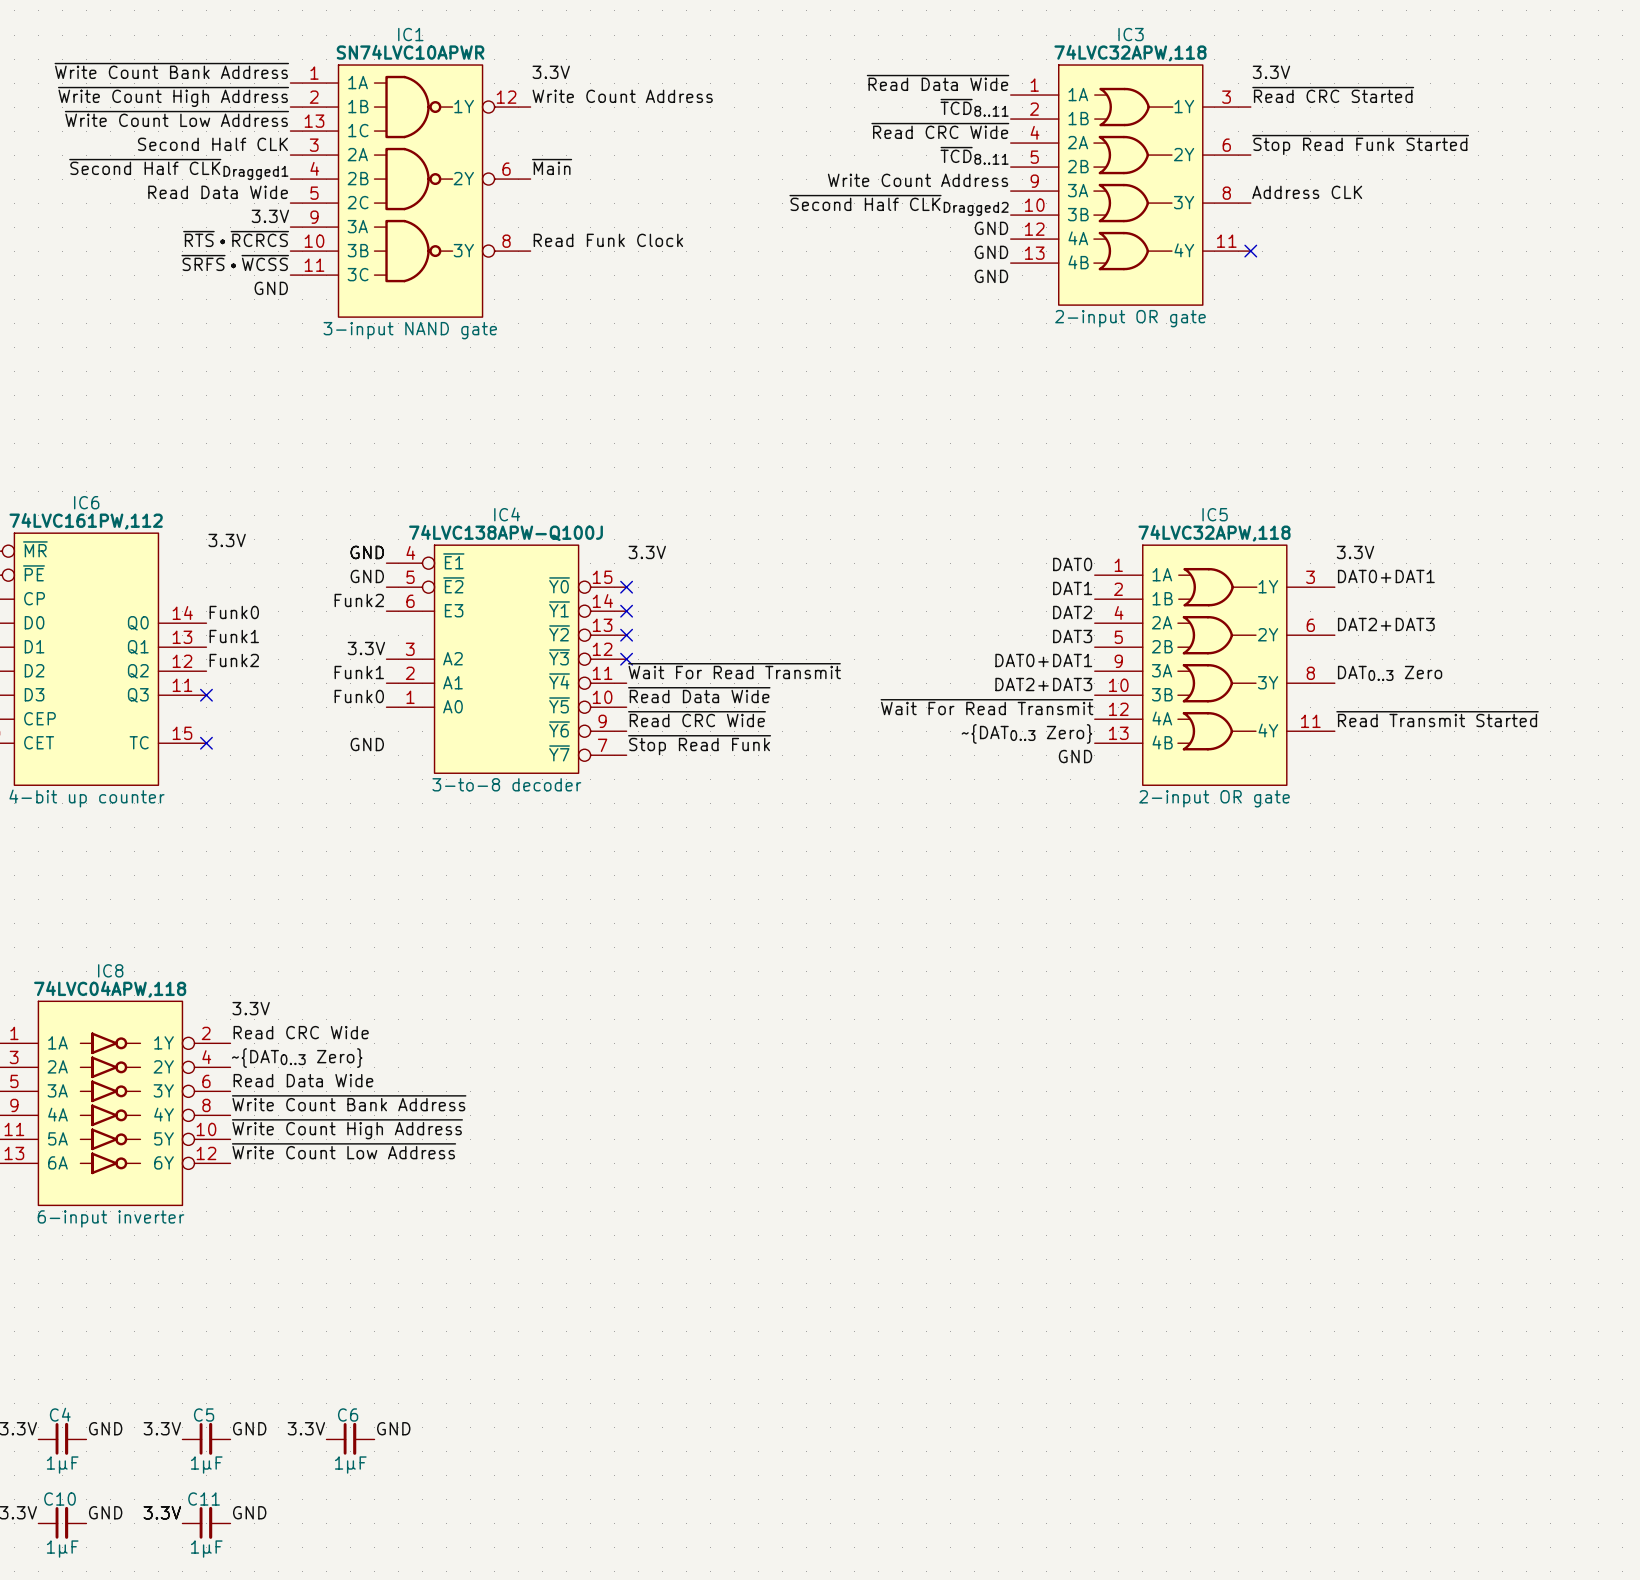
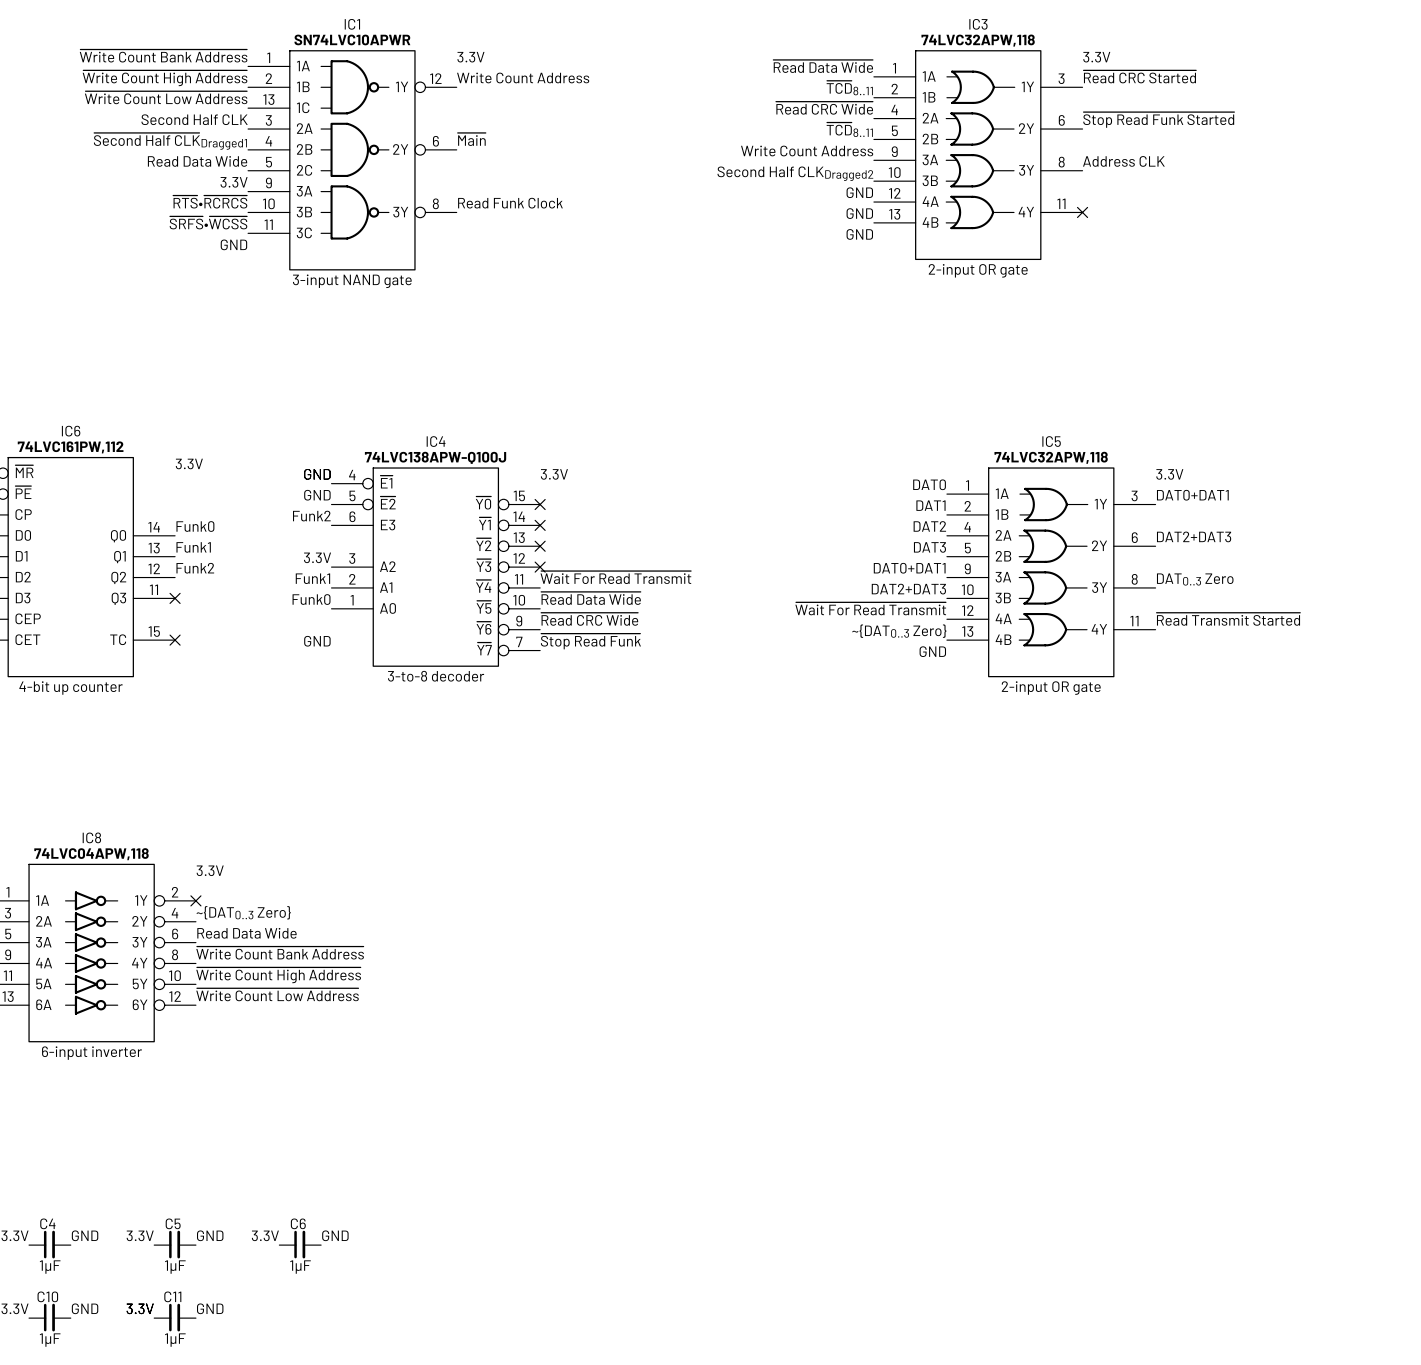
label: ~{Second Half CLK}Dragged2 (899, 205) -> Second Half CLKDragged2 (795, 173)
label: Read CRC Wide (301, 1032) -> none
no-connect mark: none -> (195, 900)

